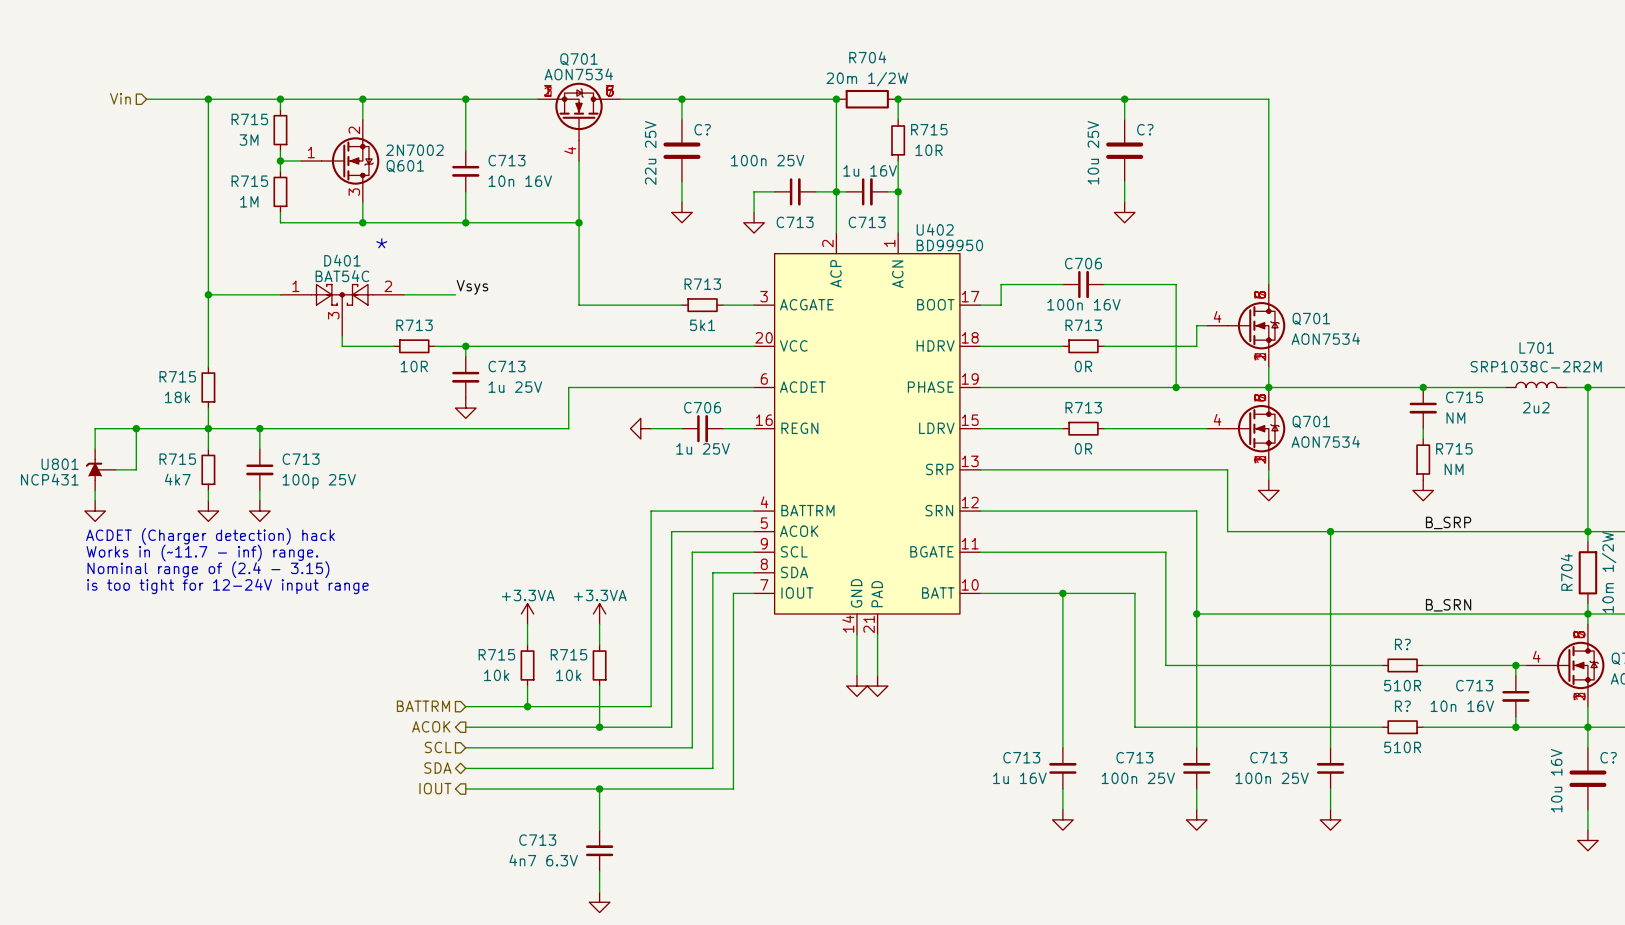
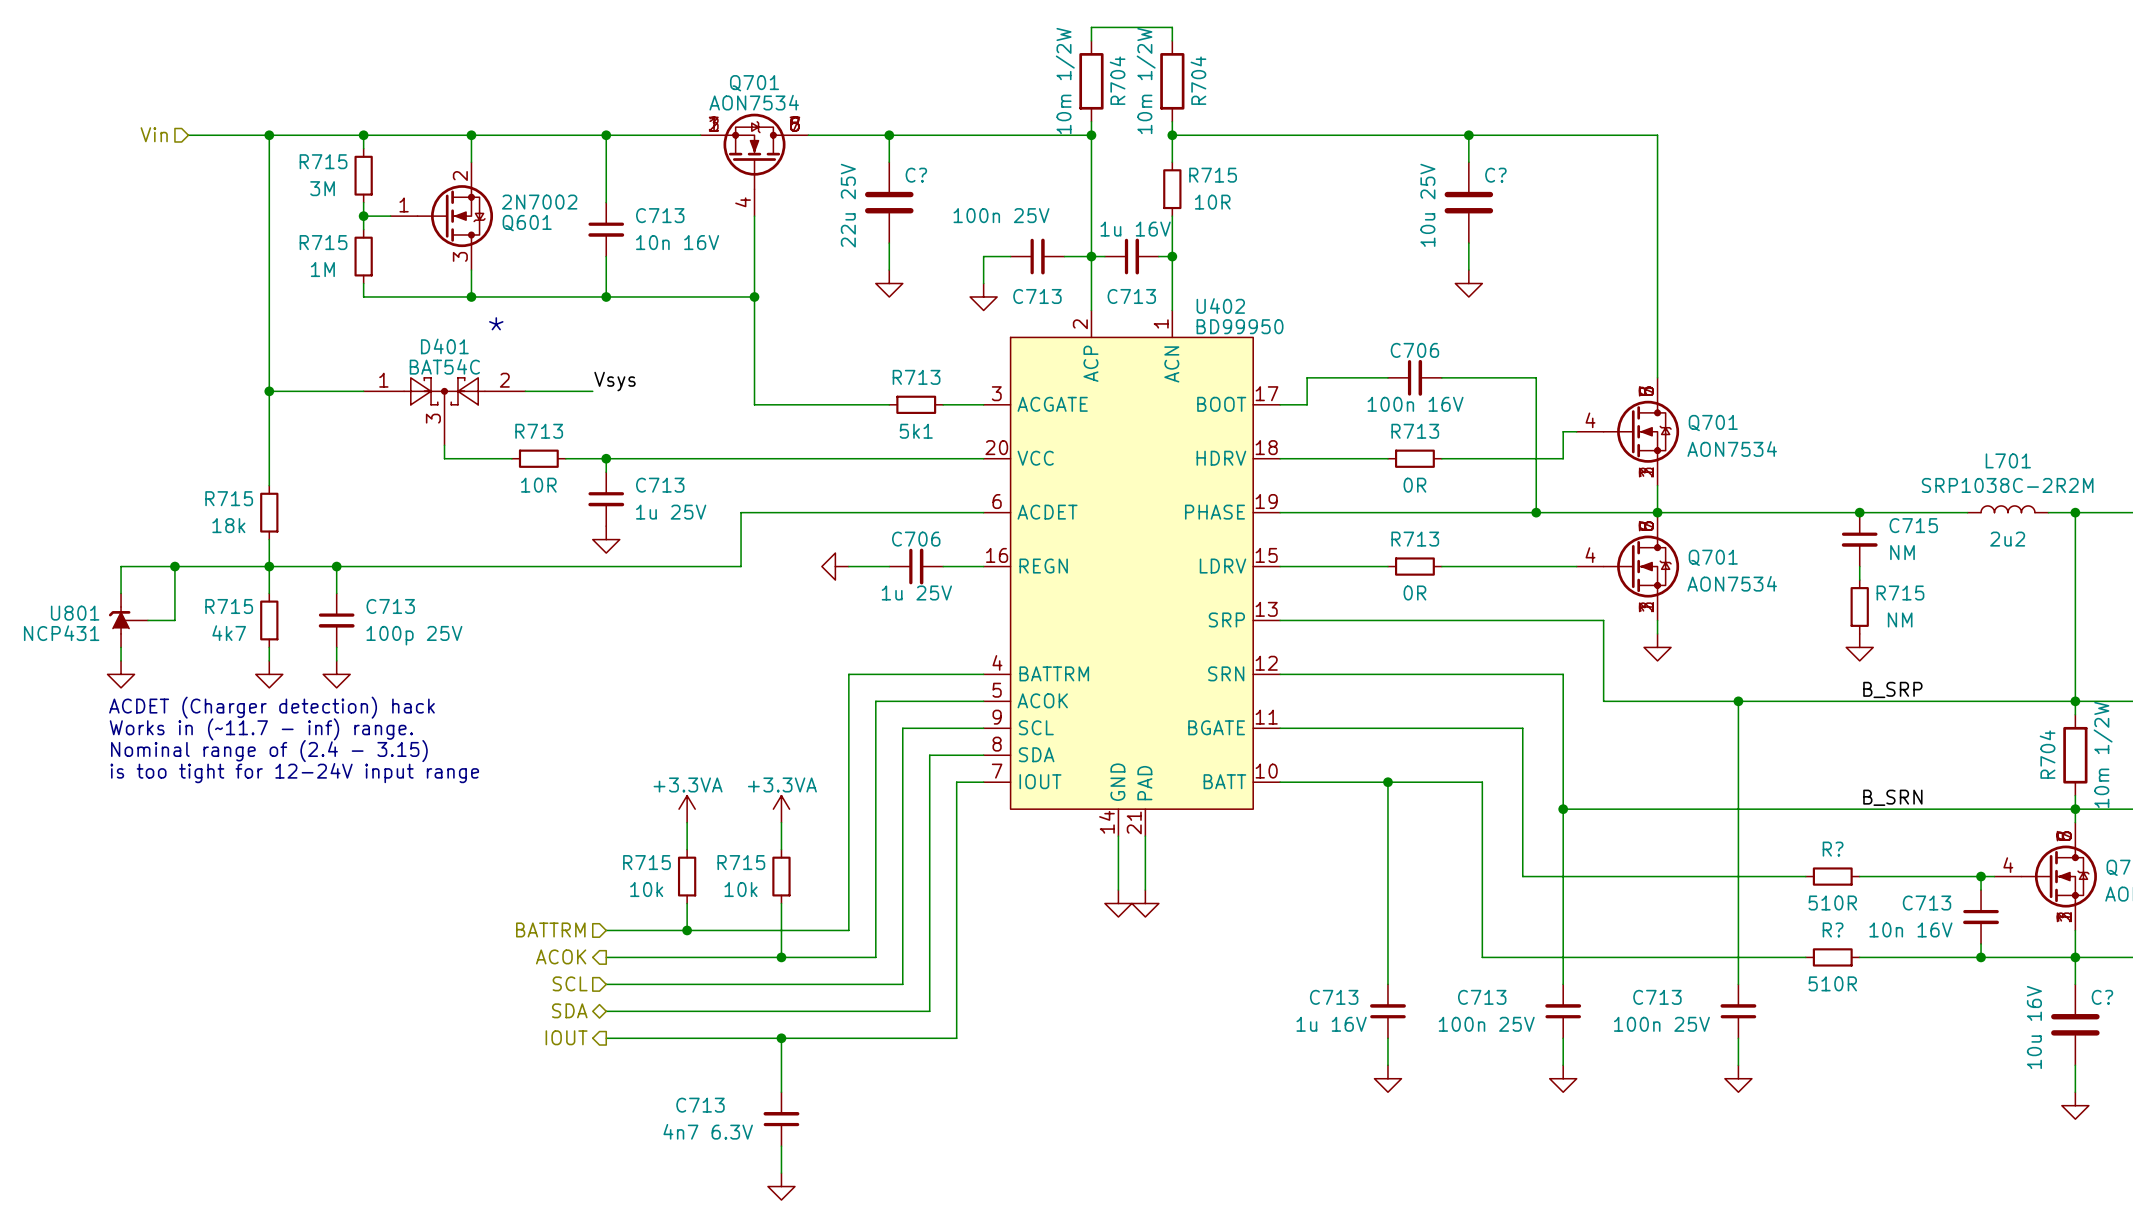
wire: none -> (1091, 40) (1091, 27) (1172, 27) (1172, 40)
R704: none -> 10m 1/2W (1091, 81)
R704: none -> 10m 1/2W (1172, 81)
wire: none -> (1091, 121) (1091, 135)
wire: none -> (1172, 121) (1172, 135)
R704: 20m 1/2W (867, 99) -> none

